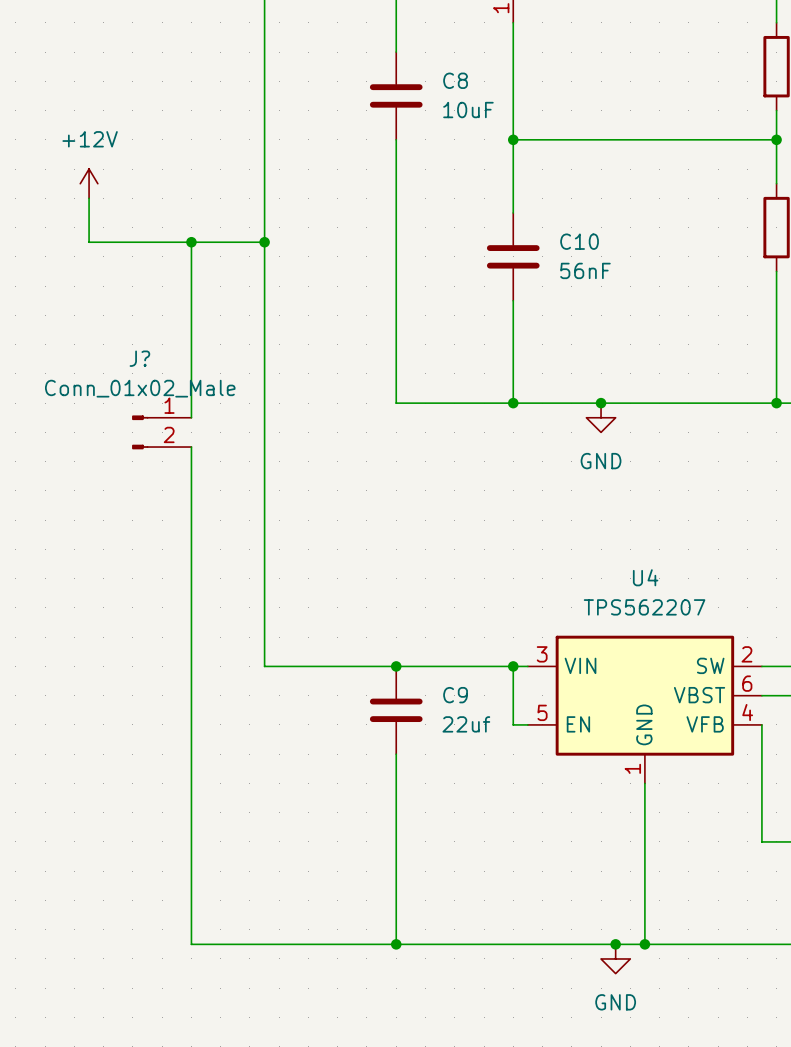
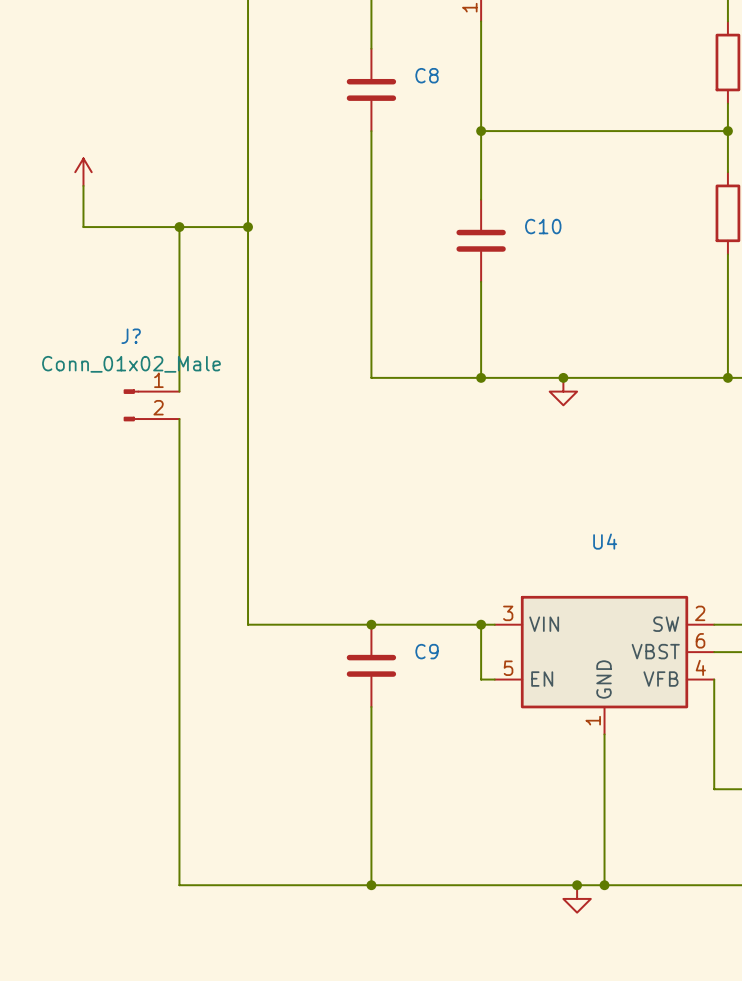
C8 value: 10uF (468, 110) -> none
power symbol text: +12V (90, 139) -> none
C10 value: 56nF (585, 270) -> none
power symbol text: GND (601, 461) -> none
U4 value: TPS562207 (644, 607) -> none
C9 value: 22uf (466, 724) -> none
power symbol text: GND (615, 1002) -> none

